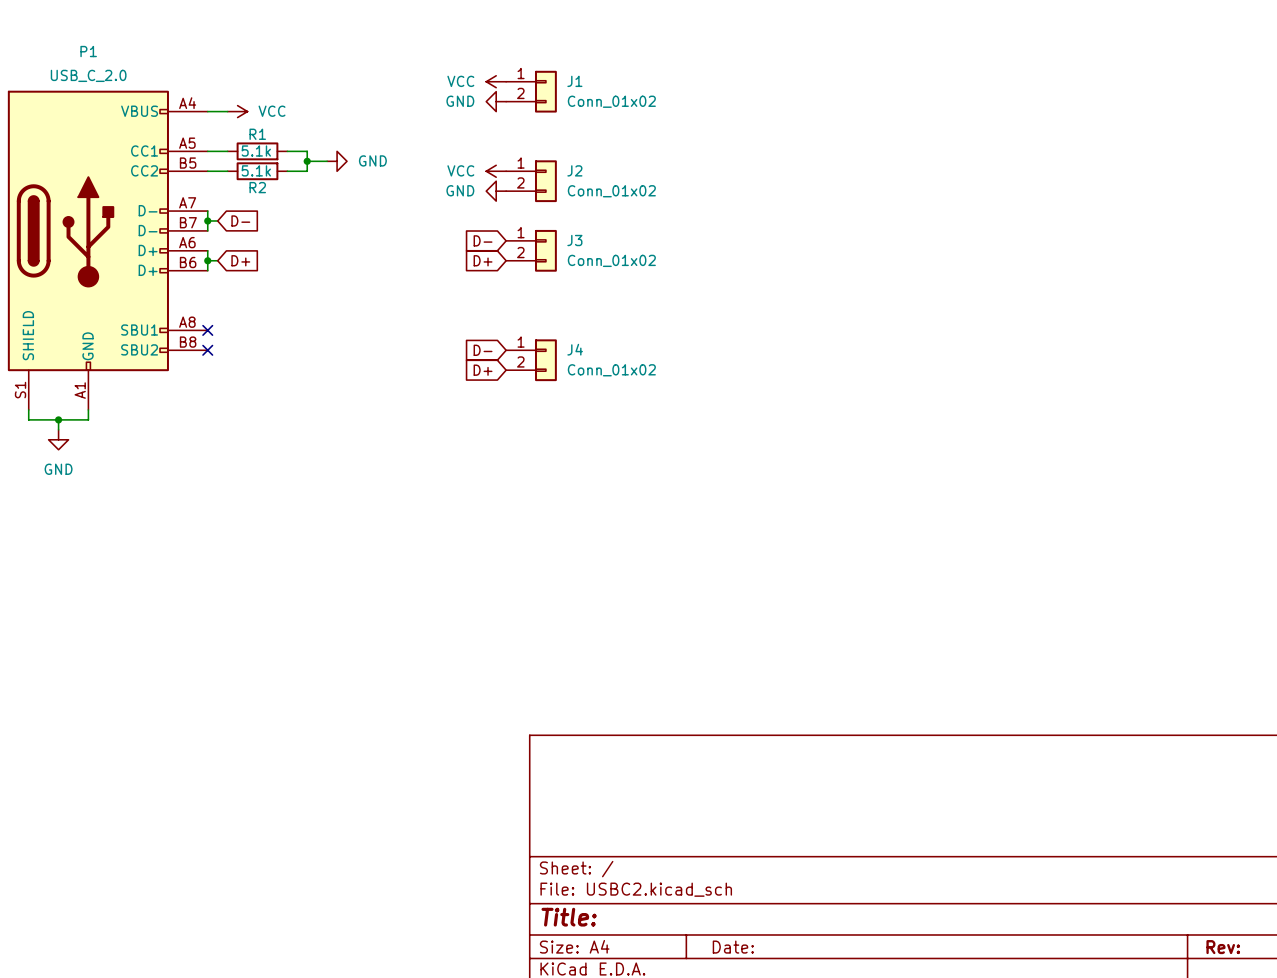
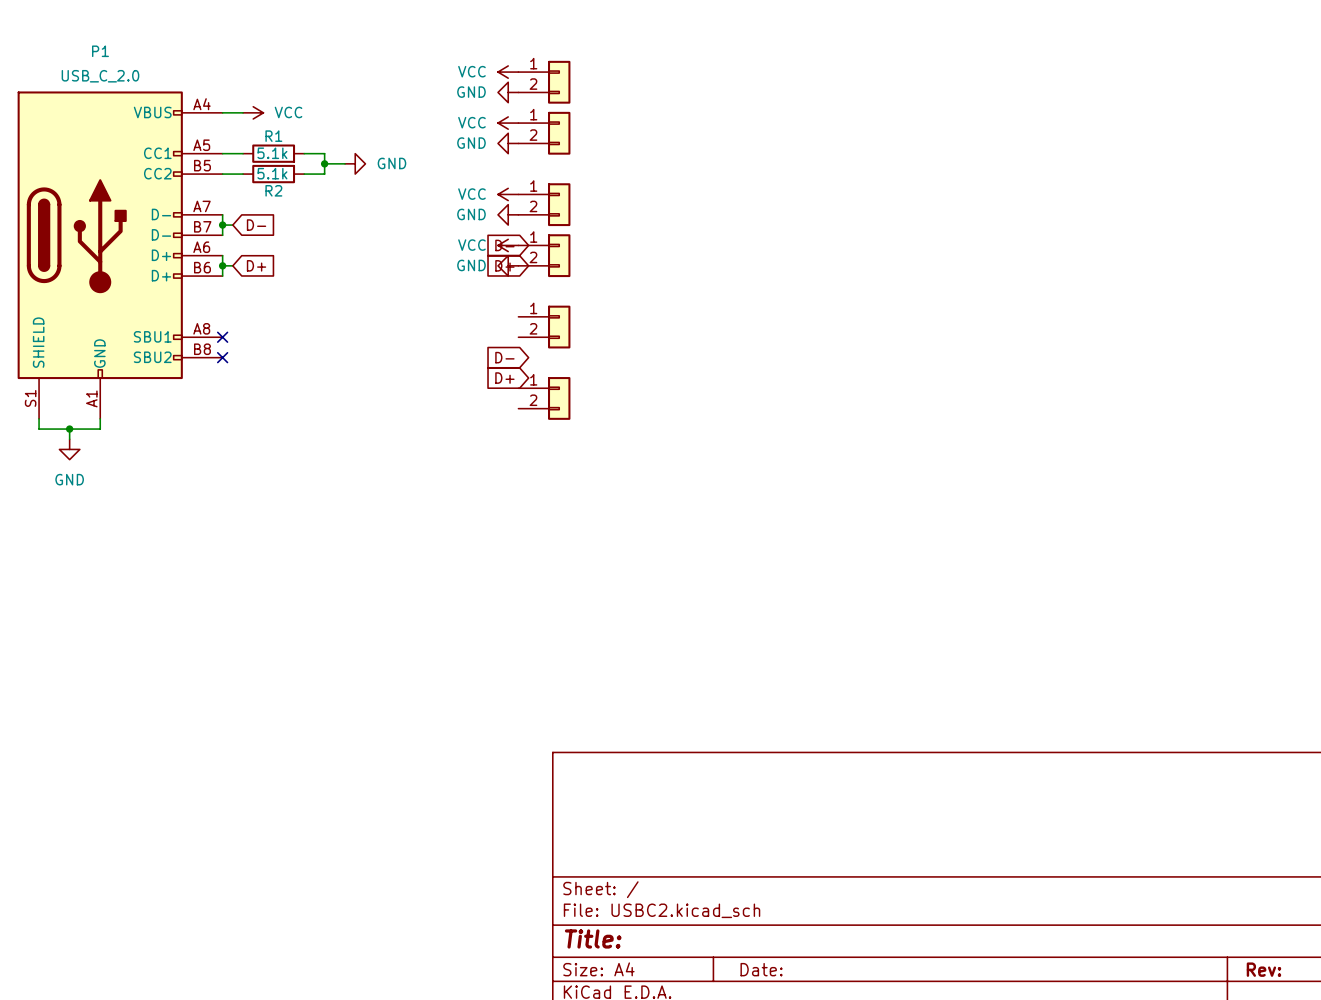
power symbol position: VCC (496, 81) -> VCC (508, 72)
part: none -> (544, 82)
J1: Conn_01x02 (531, 91) -> none
power symbol position: GND (496, 101) -> GND (508, 92)
power symbol: none -> VCC (508, 123)
part: none -> (544, 133)
power symbol: none -> GND (508, 143)
power symbol position: VCC (496, 171) -> VCC (508, 194)
J2: Conn_01x02 (531, 181) -> none
power symbol position: GND (496, 191) -> GND (508, 214)
part: none -> (544, 204)
power symbol: none -> VCC (508, 245)
part: none -> (544, 255)
J3: Conn_01x02 (531, 250) -> none
power symbol: none -> GND (508, 265)
part: none -> (544, 327)
J4: Conn_01x02 (531, 360) -> none
part: none -> (544, 398)

